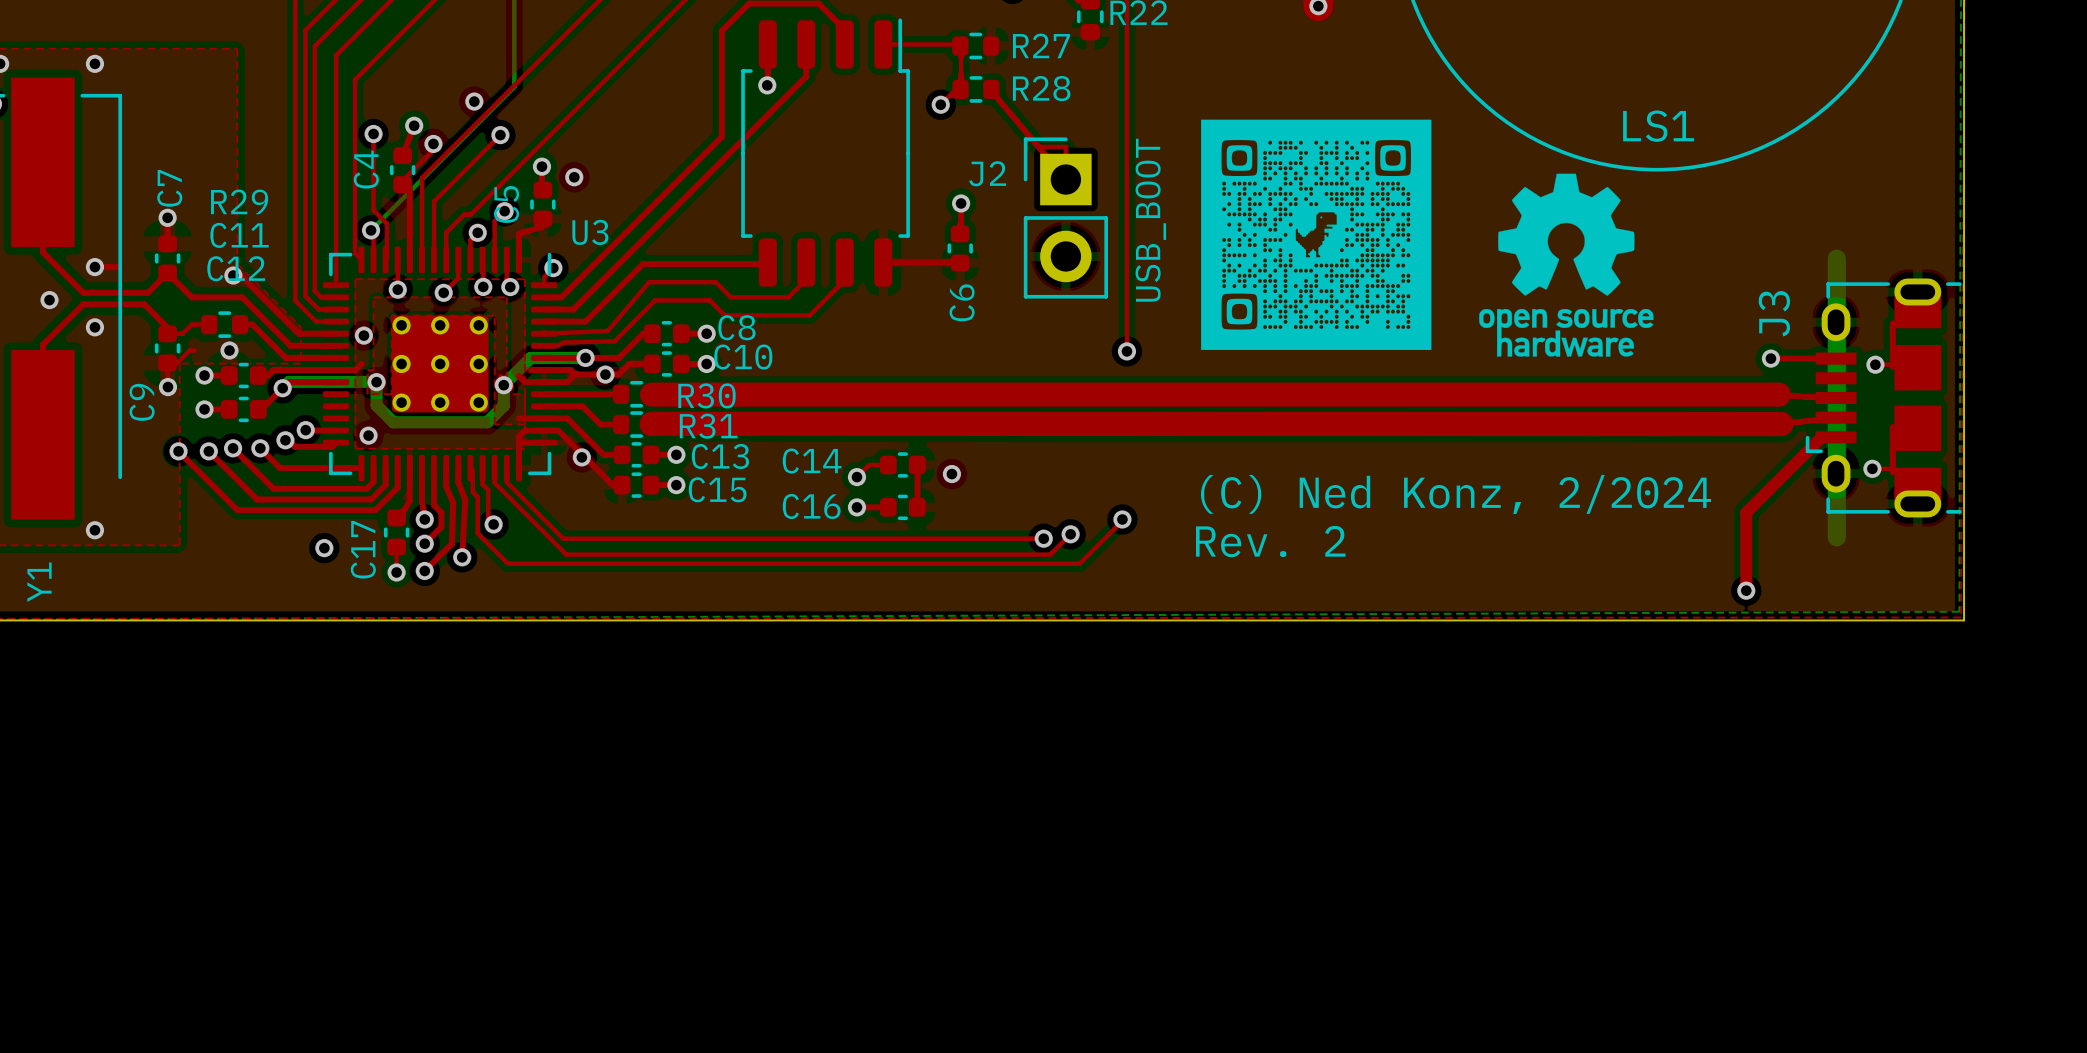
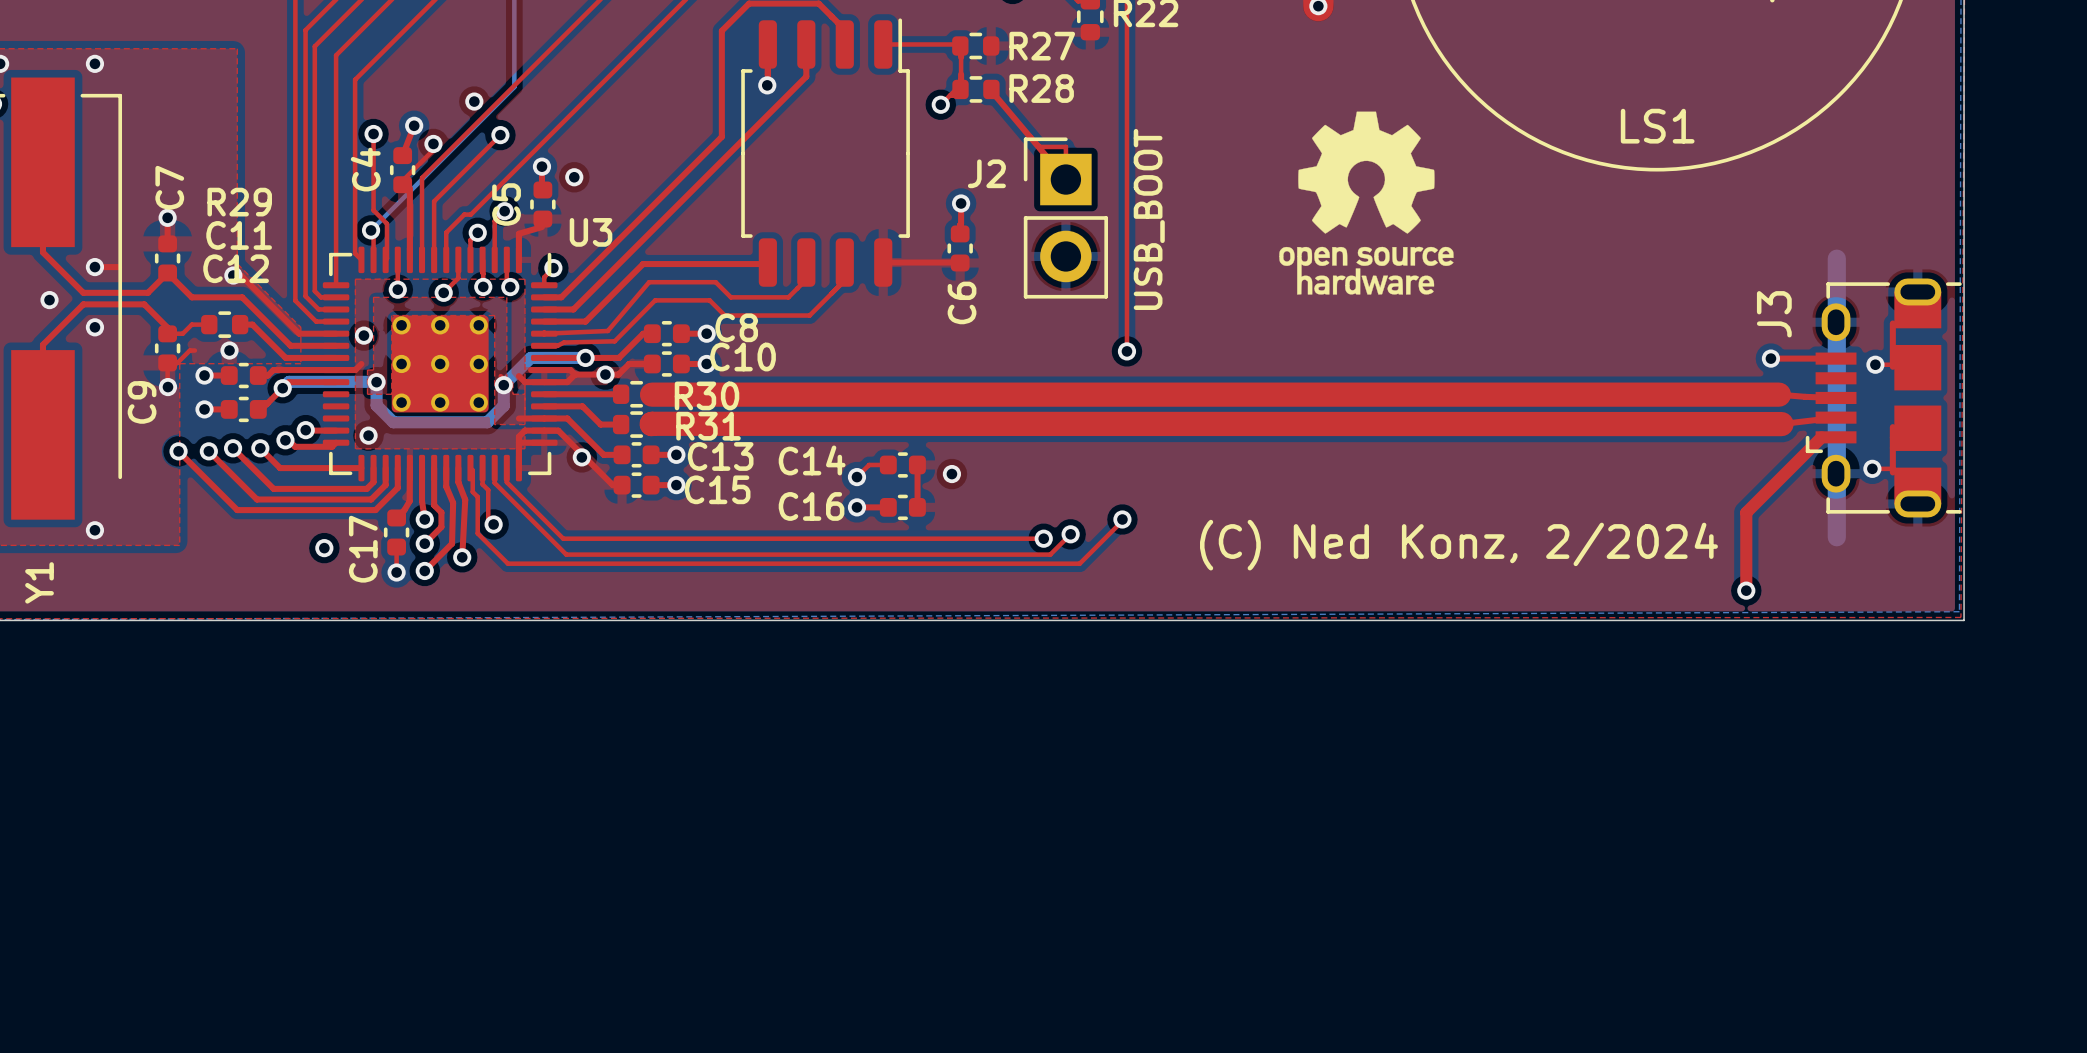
drawing: [1201, 119, 1432, 350] -> none
drawing position: (1566, 265) -> (1366, 203)
text: (C) Ned Konz, 2/2024 (1456, 494) -> none
text: Rev. 2 (1270, 541) -> (C) Ned Konz, 2/2024 (1458, 545)

